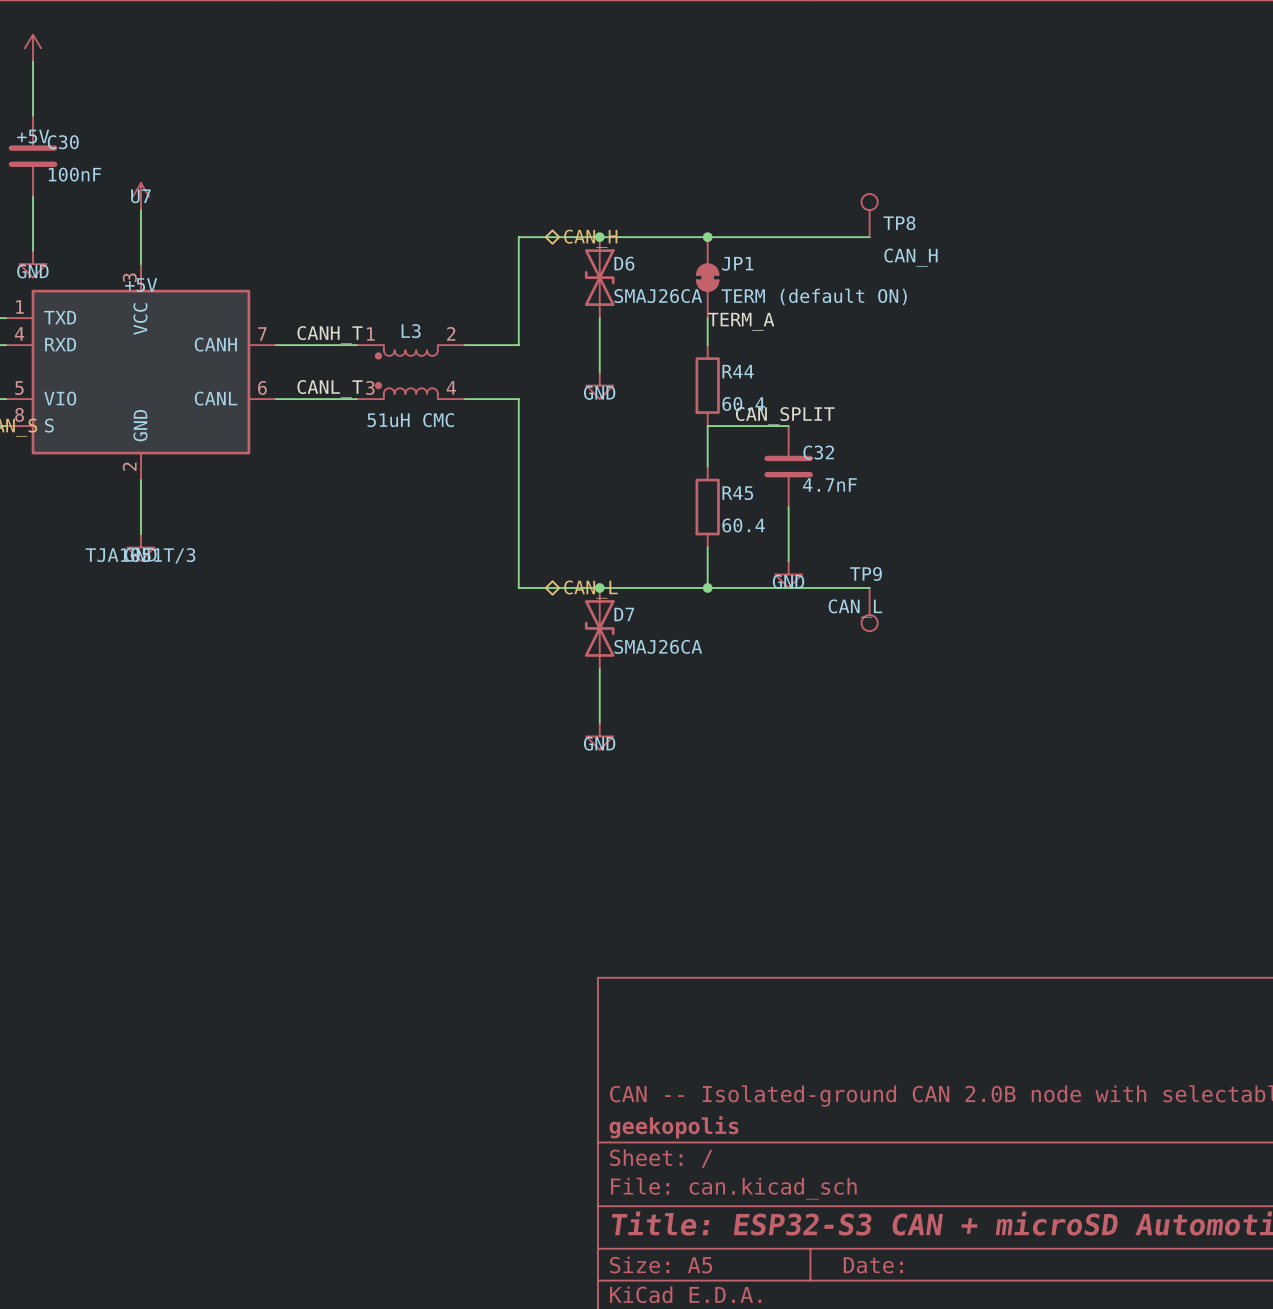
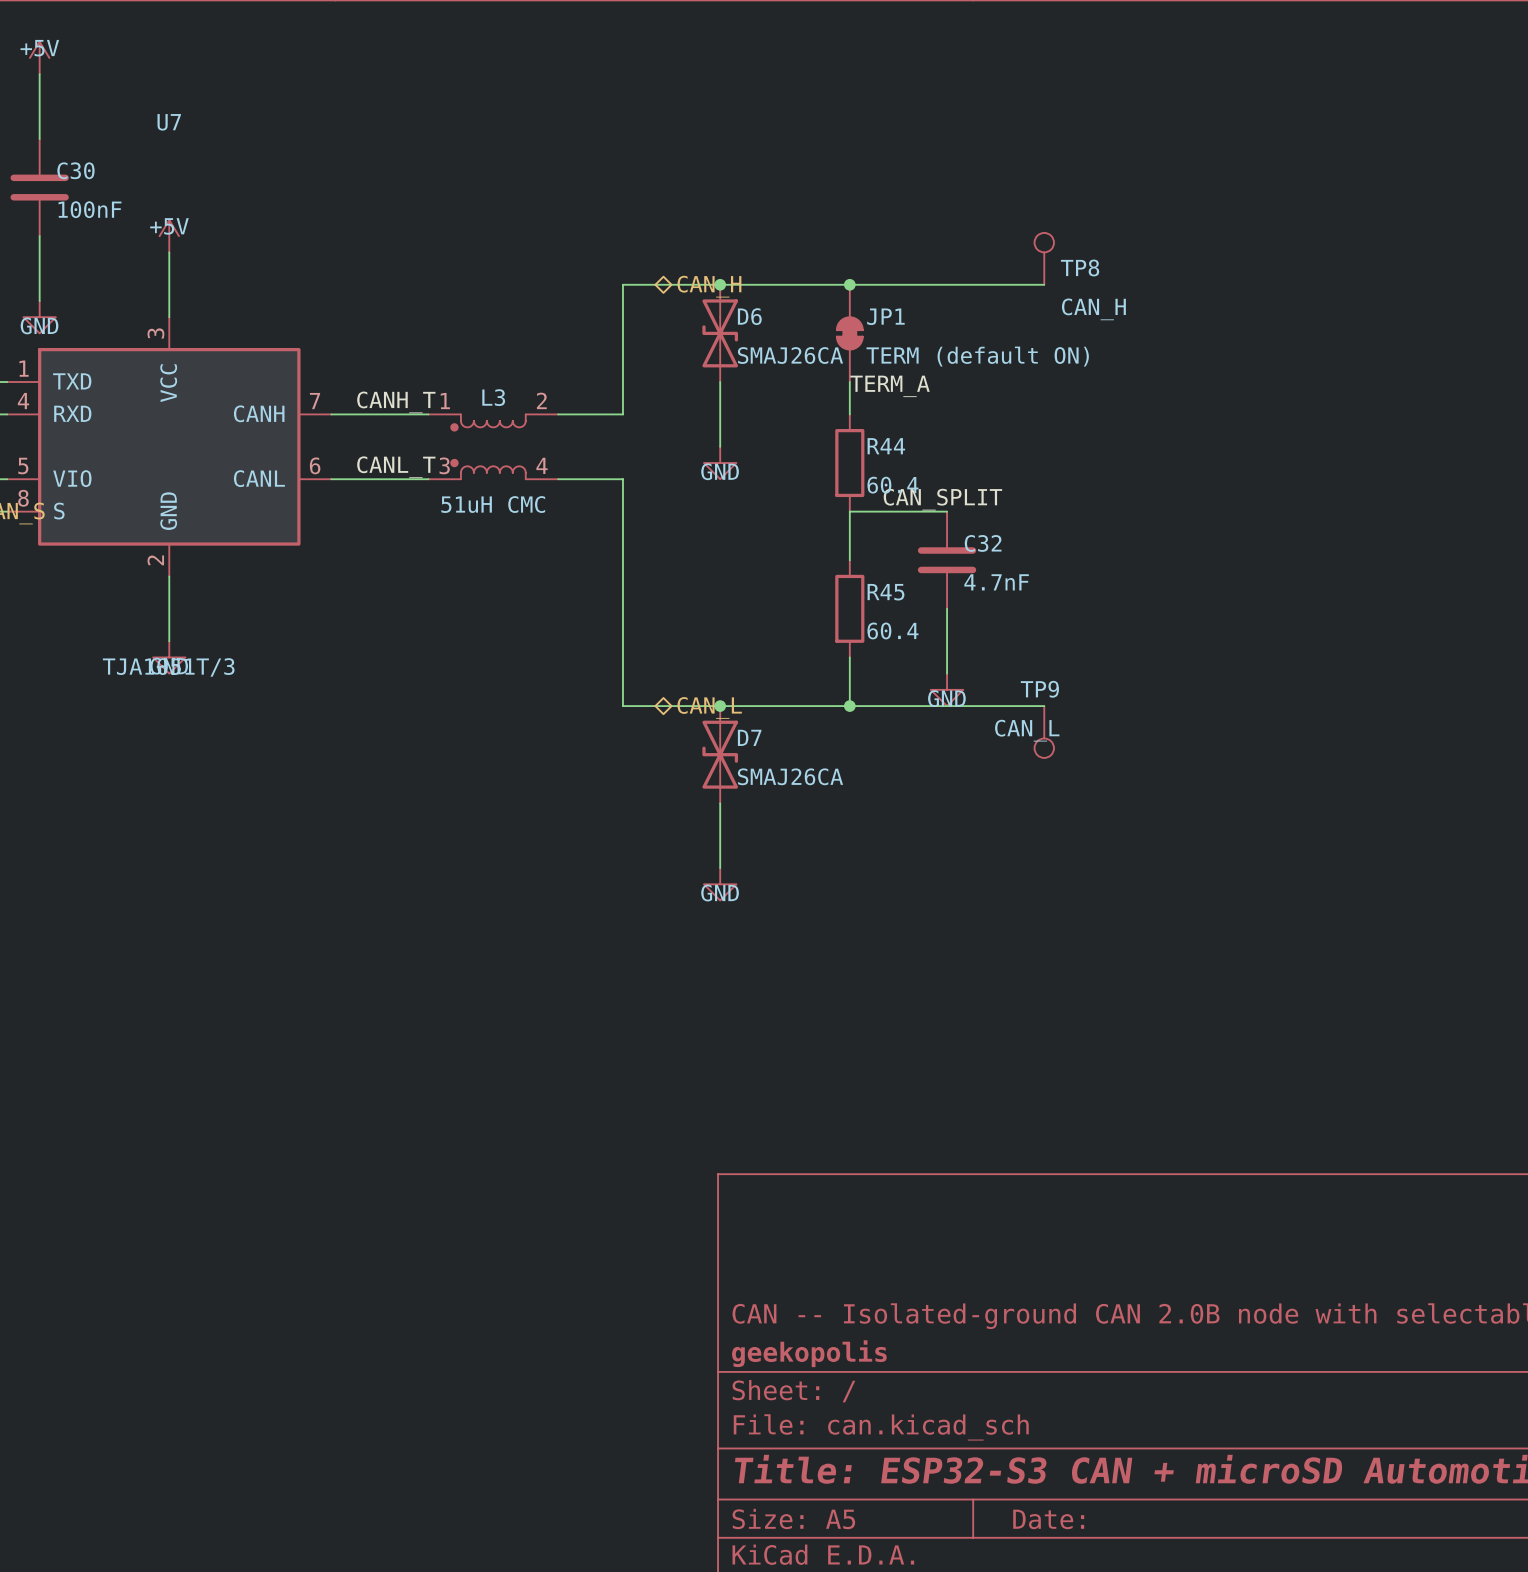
power symbol text position: +5V (33, 136) -> +5V (39, 48)
U7 name position: U7 (140, 196) -> U7 (169, 122)
power symbol text position: +5V (141, 285) -> +5V (169, 226)

